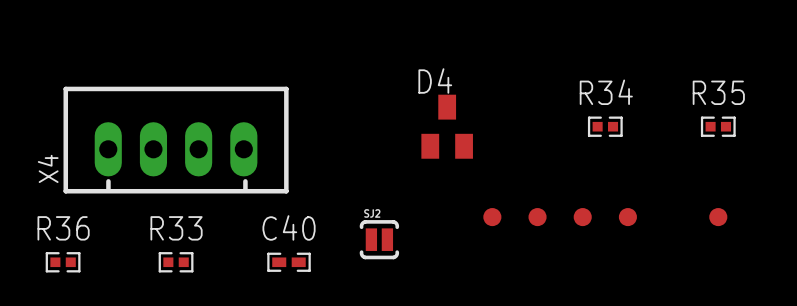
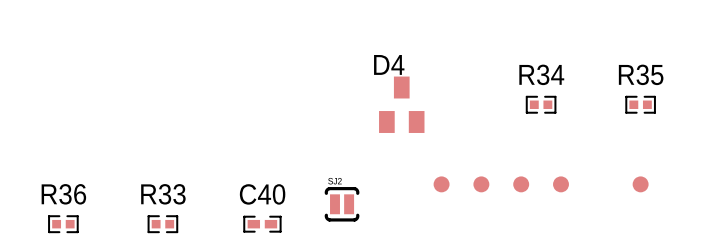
X4: (176, 140) -> none

